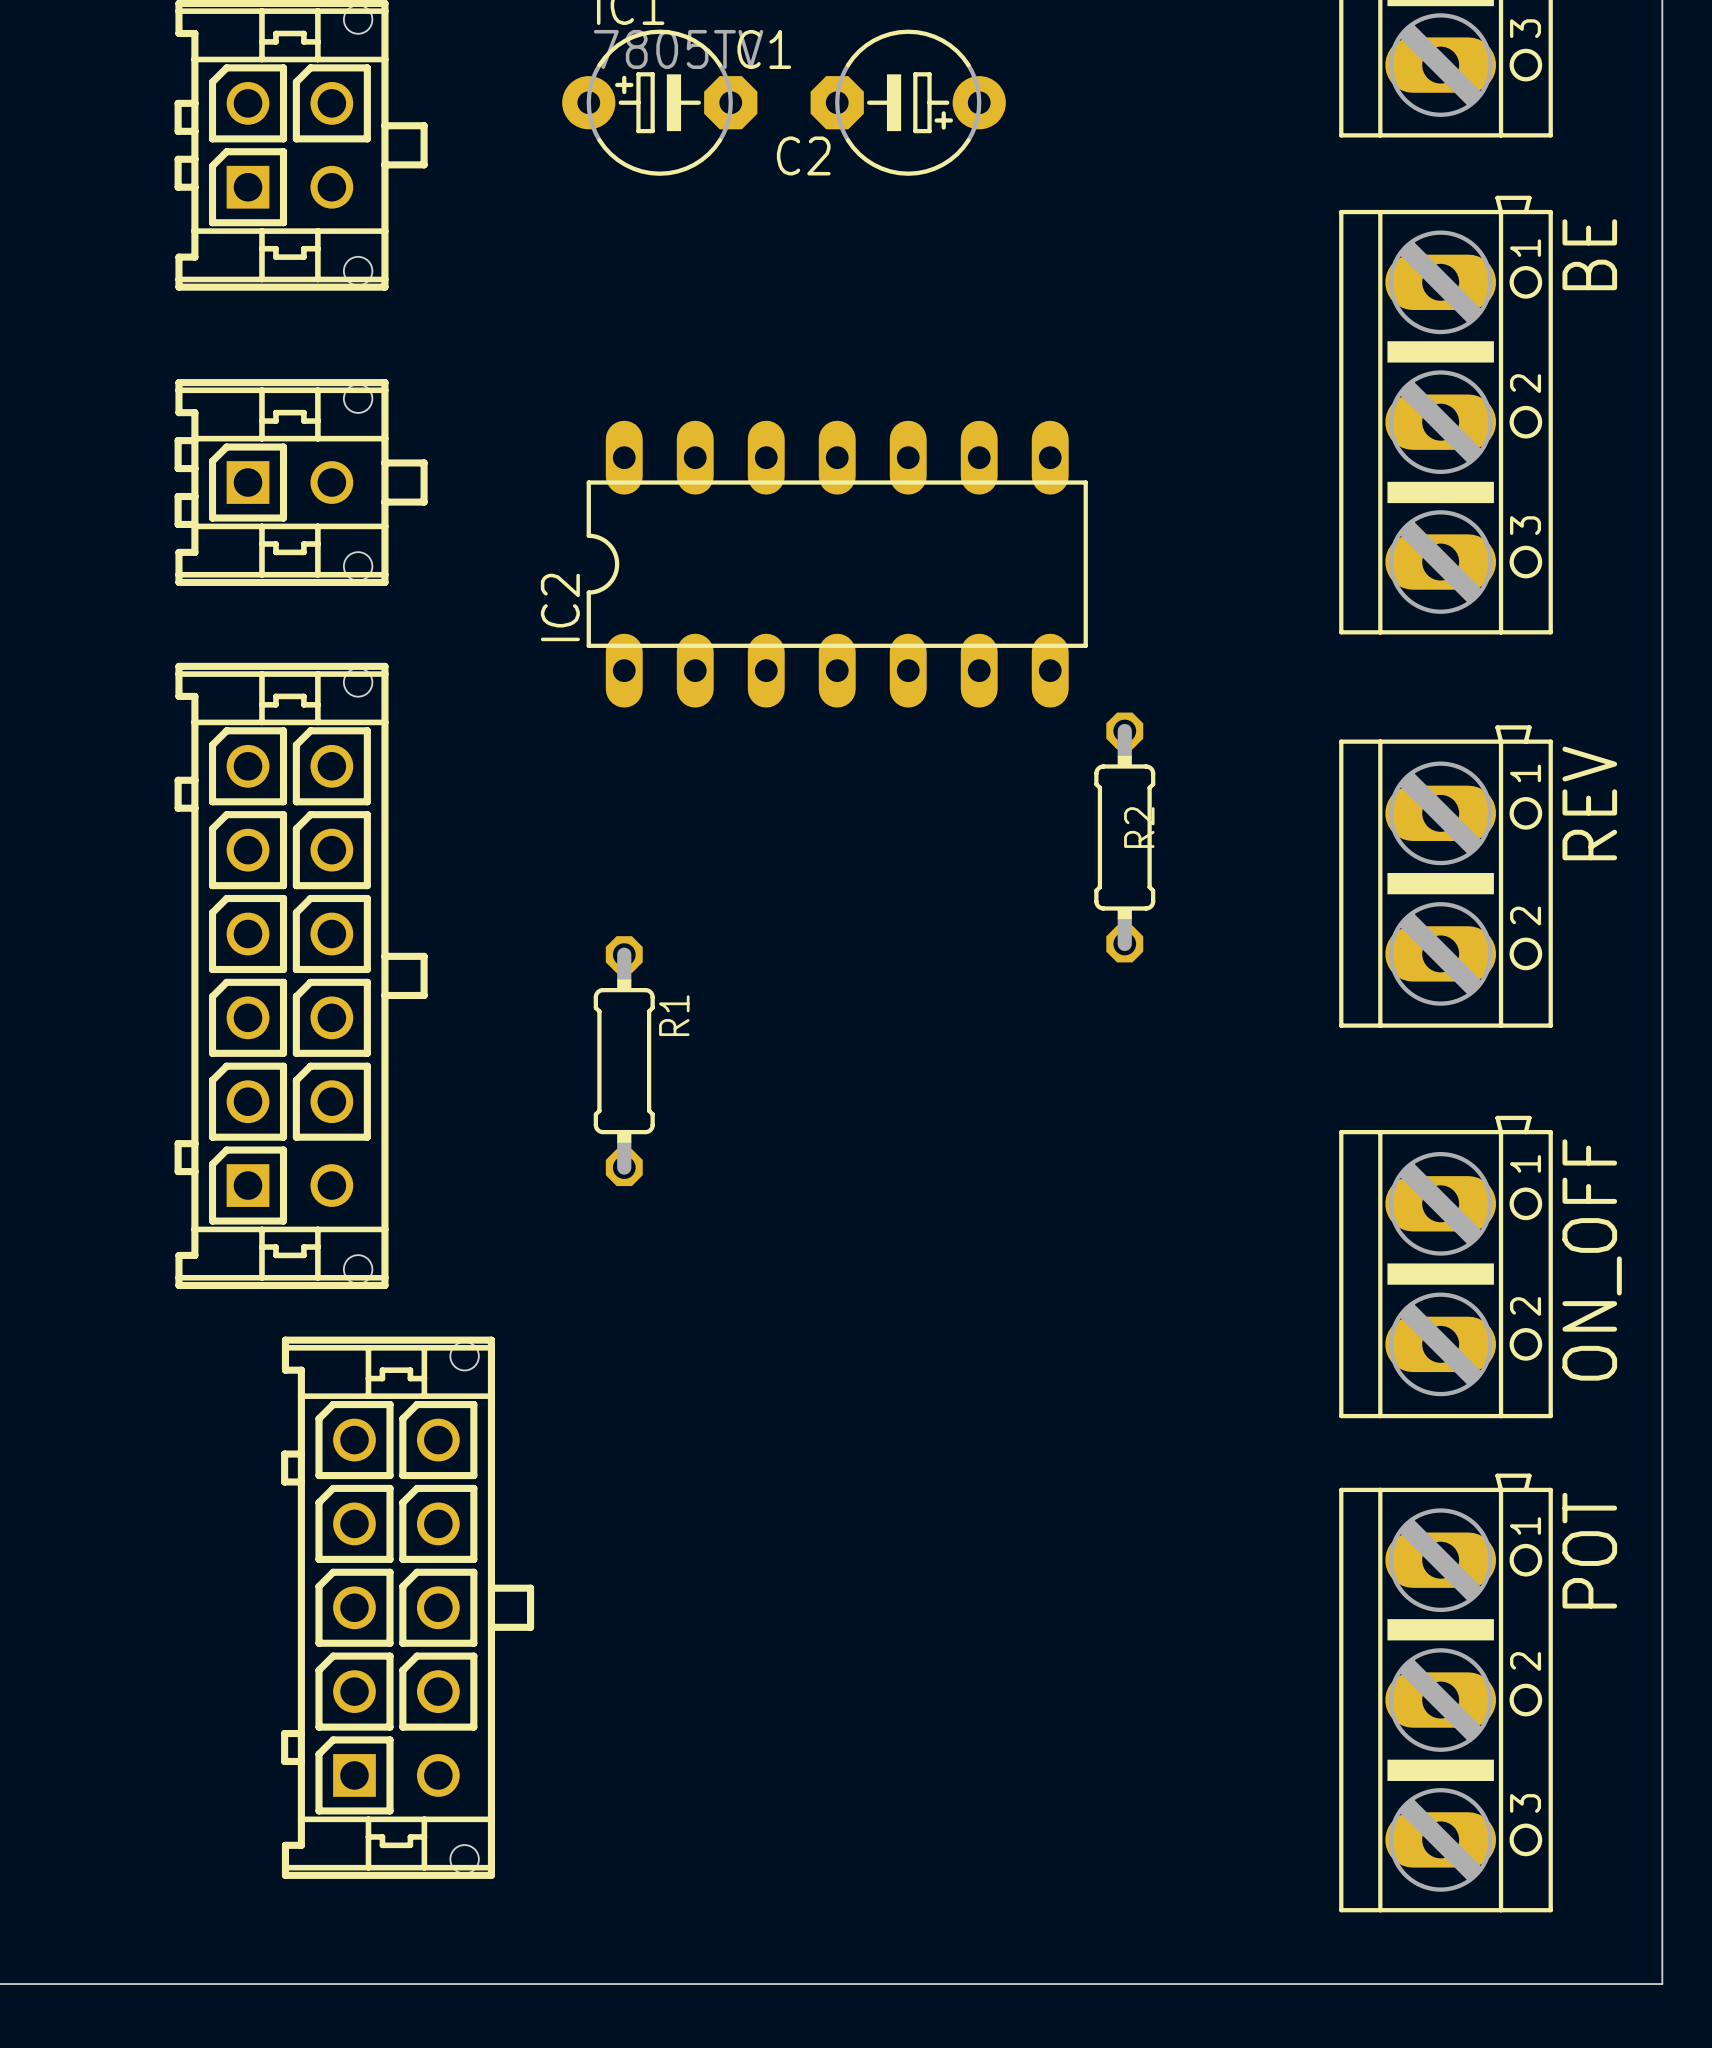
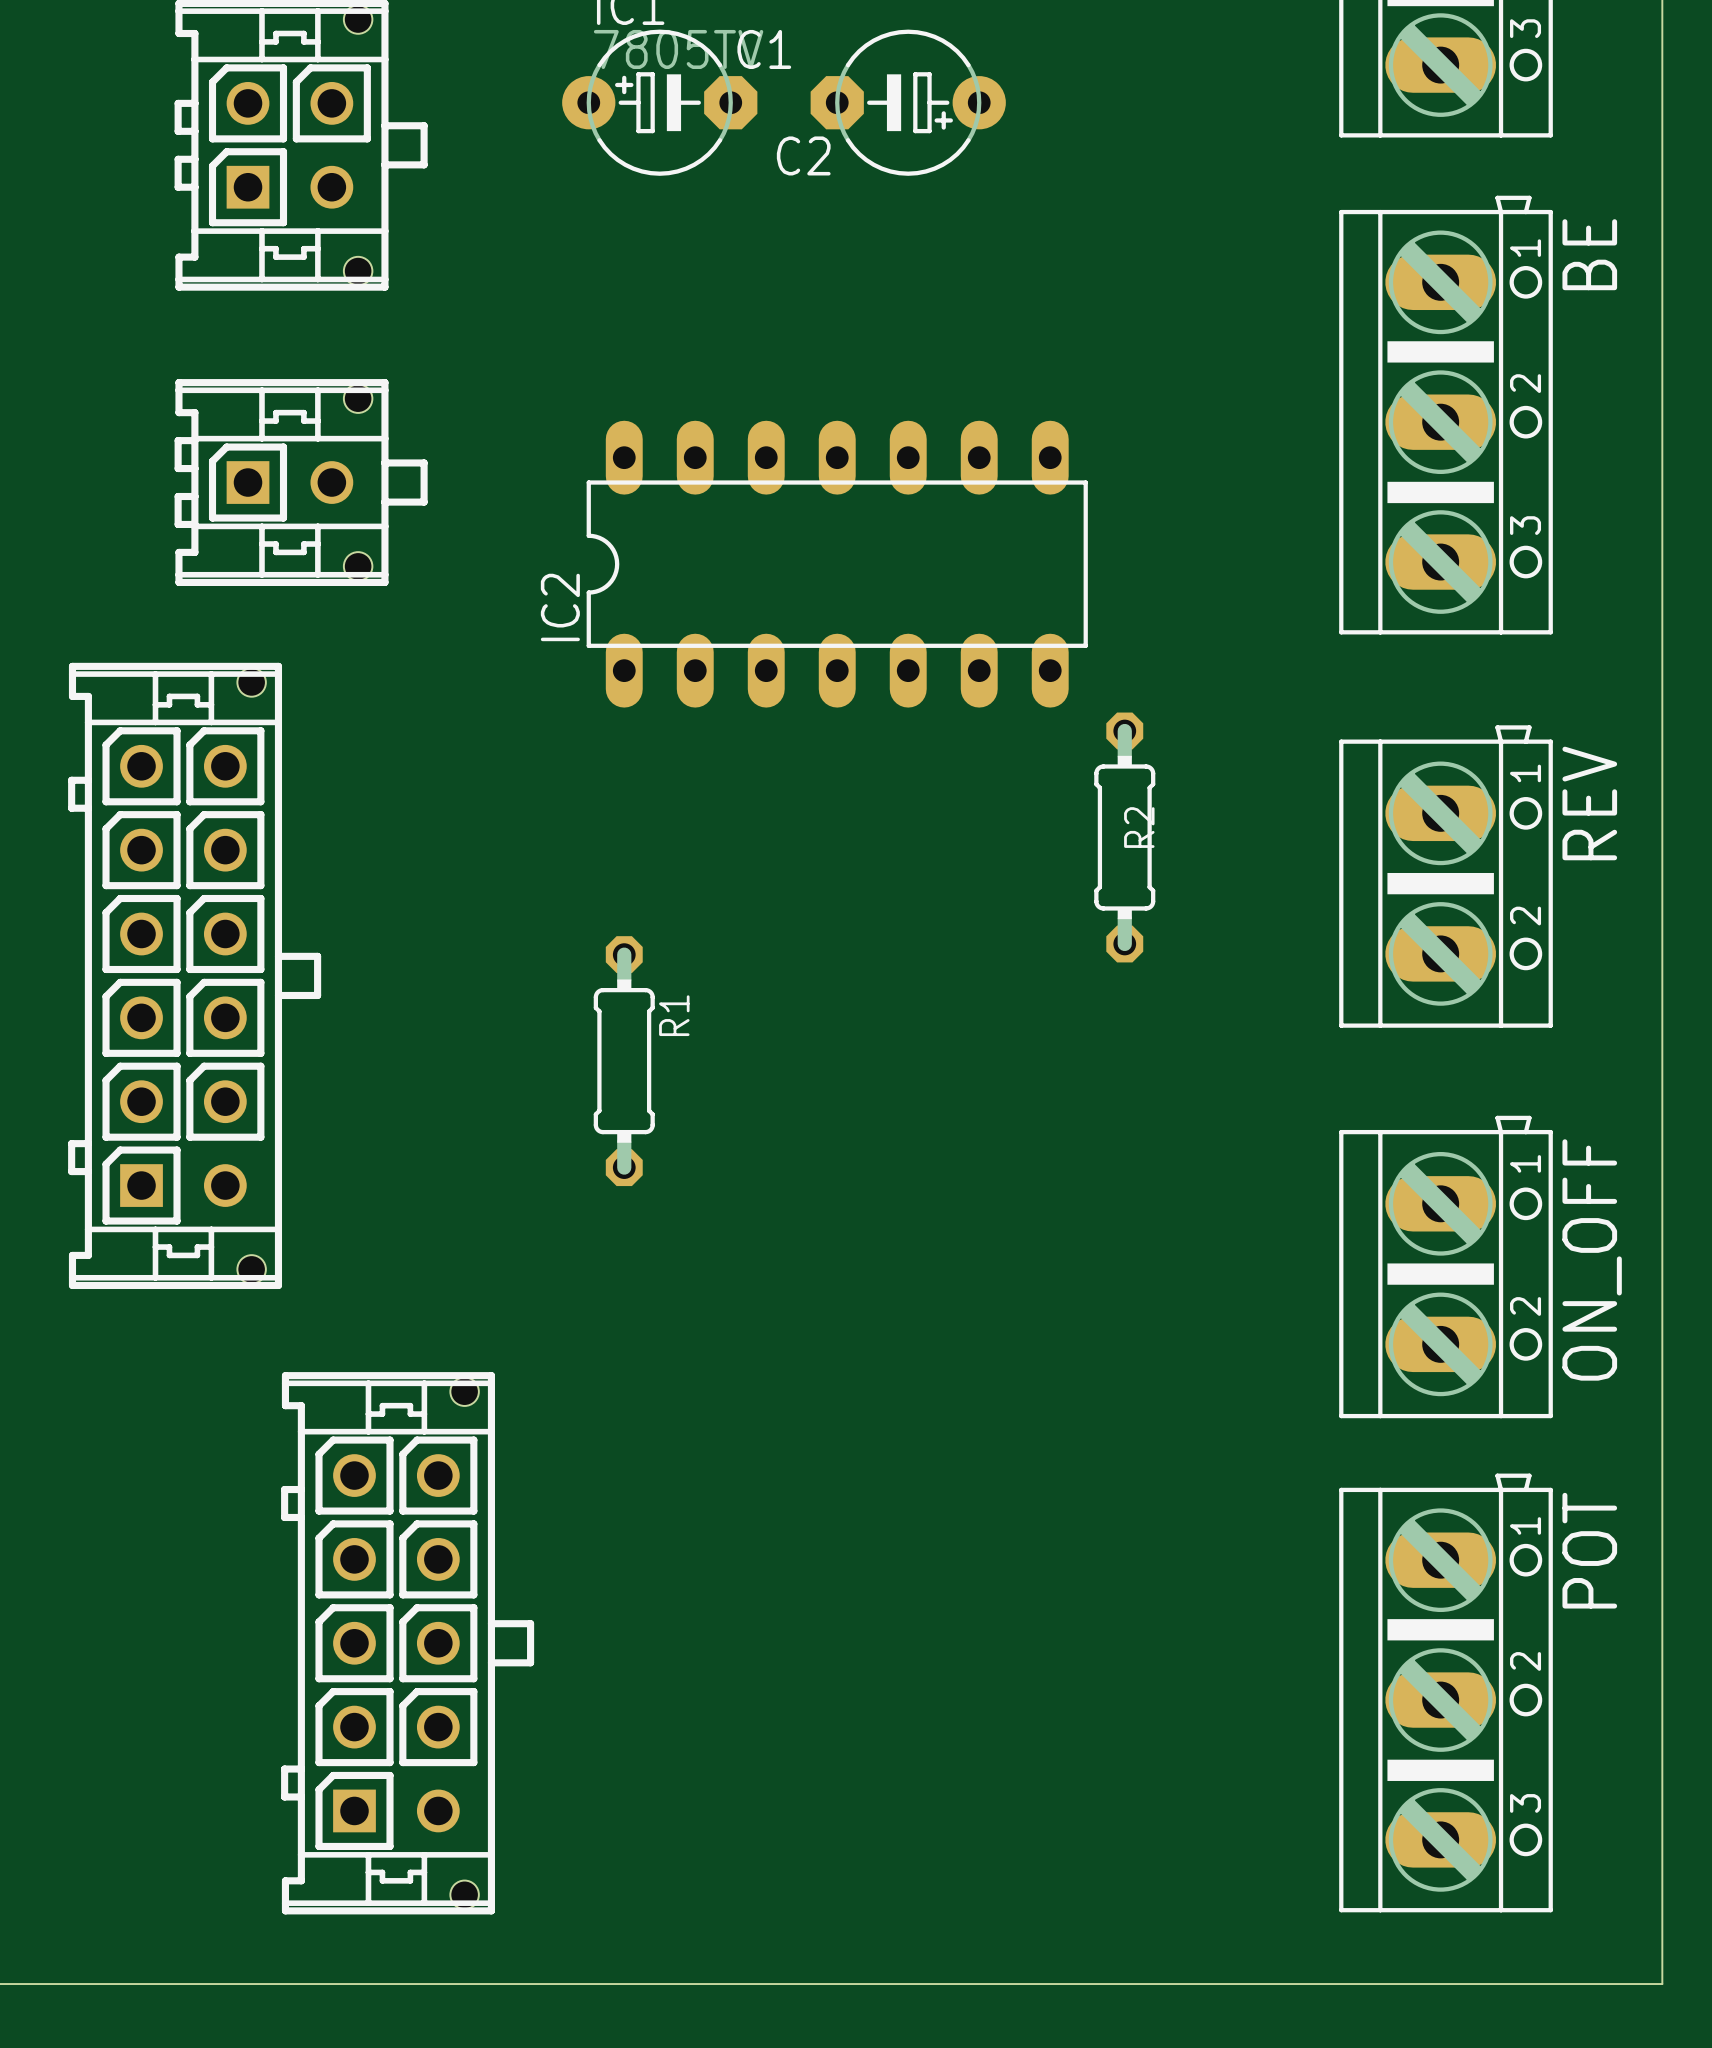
part position: (301, 975) -> (194, 975)
part position: (407, 1607) -> (407, 1643)

